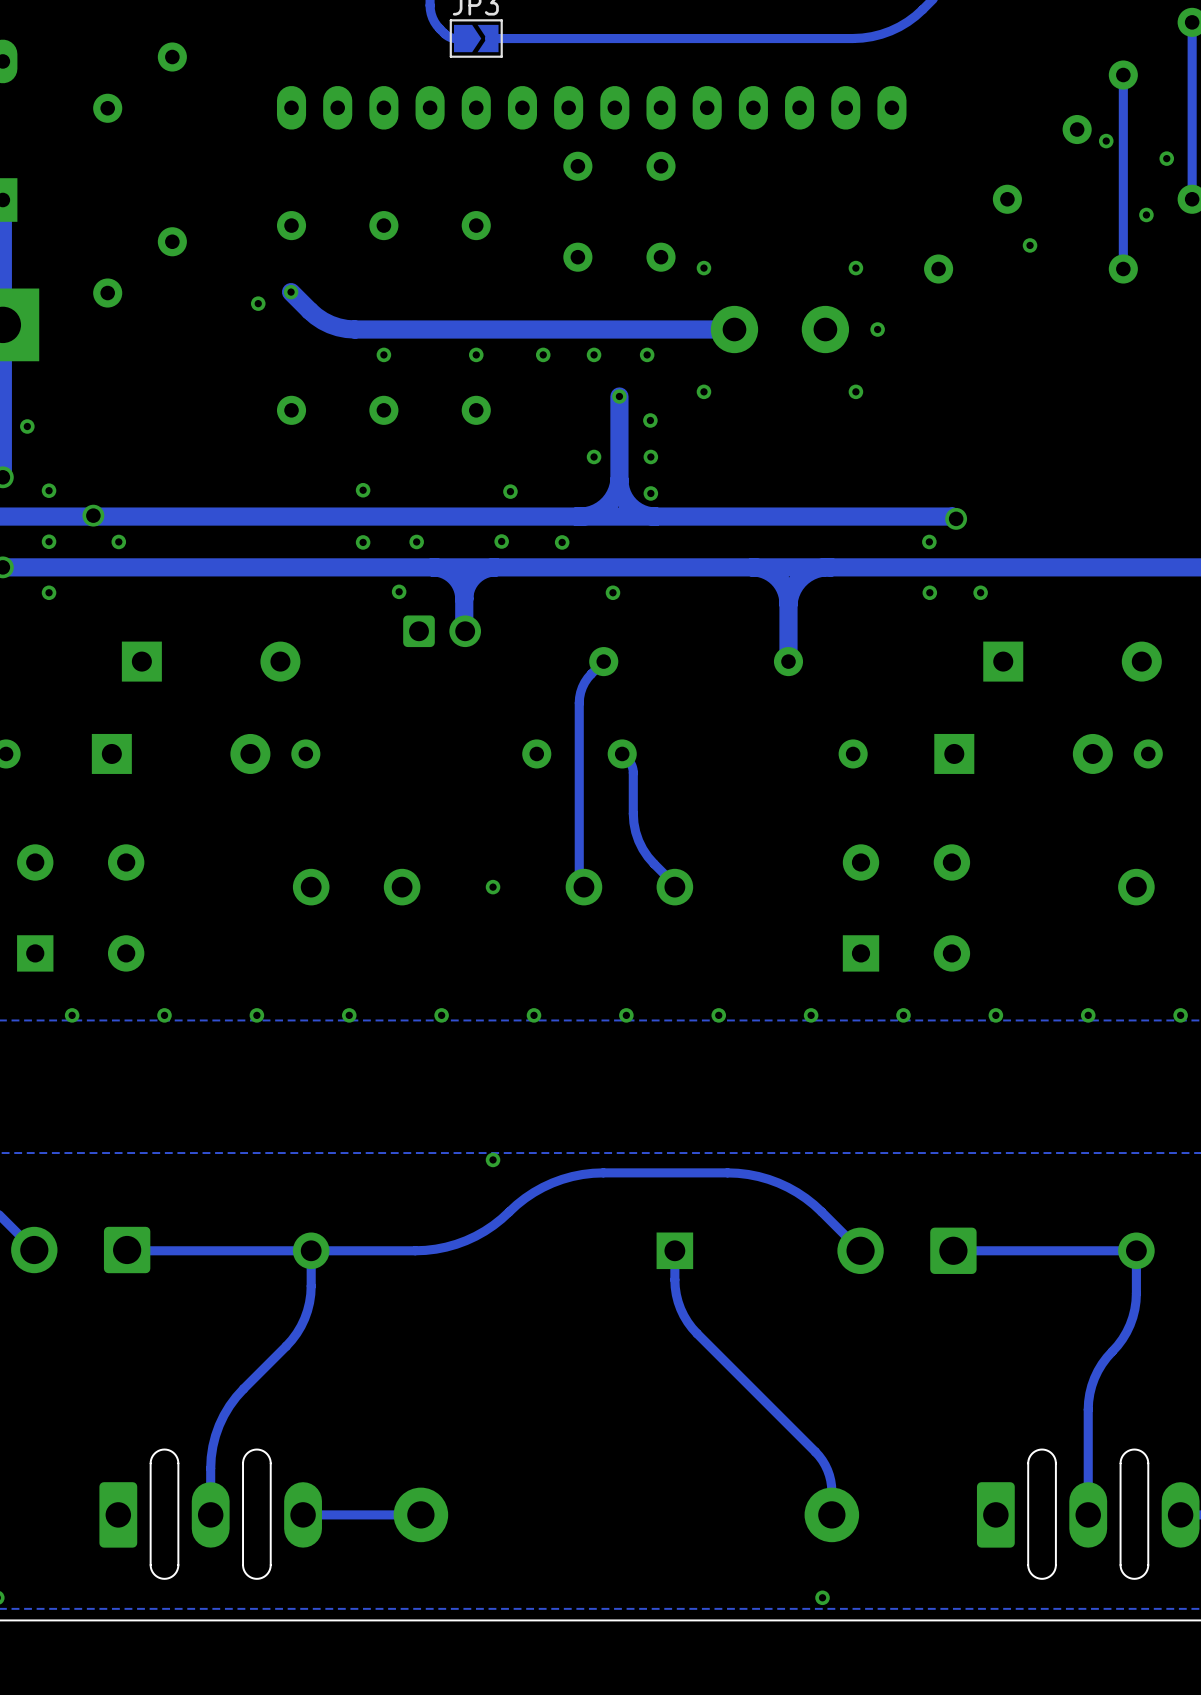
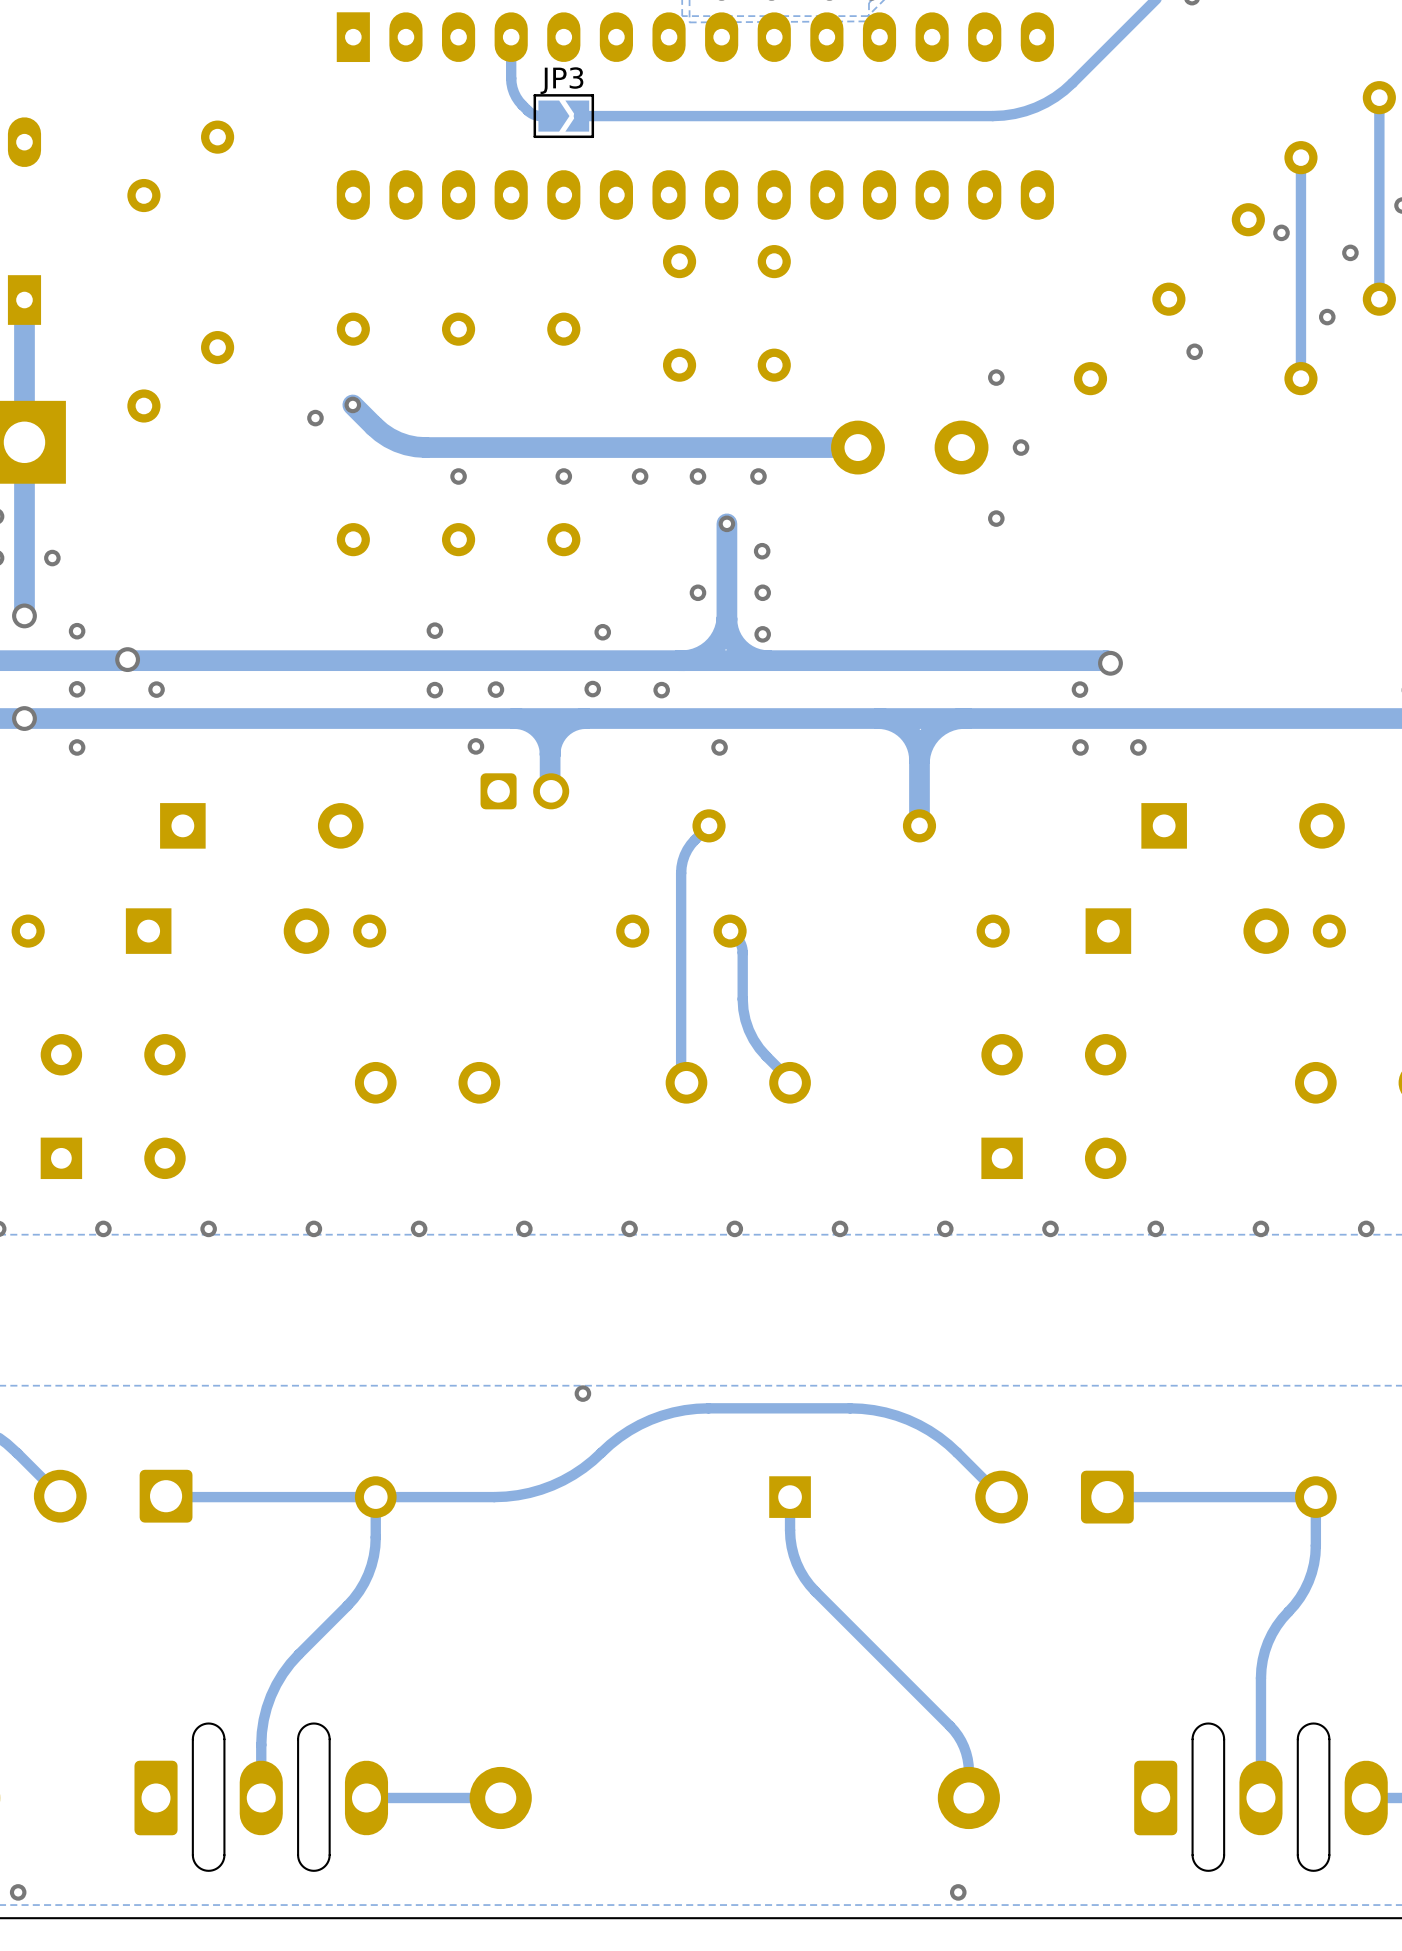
via: (703, 268) -> none
via: (703, 391) -> none
via: (493, 887) -> none

